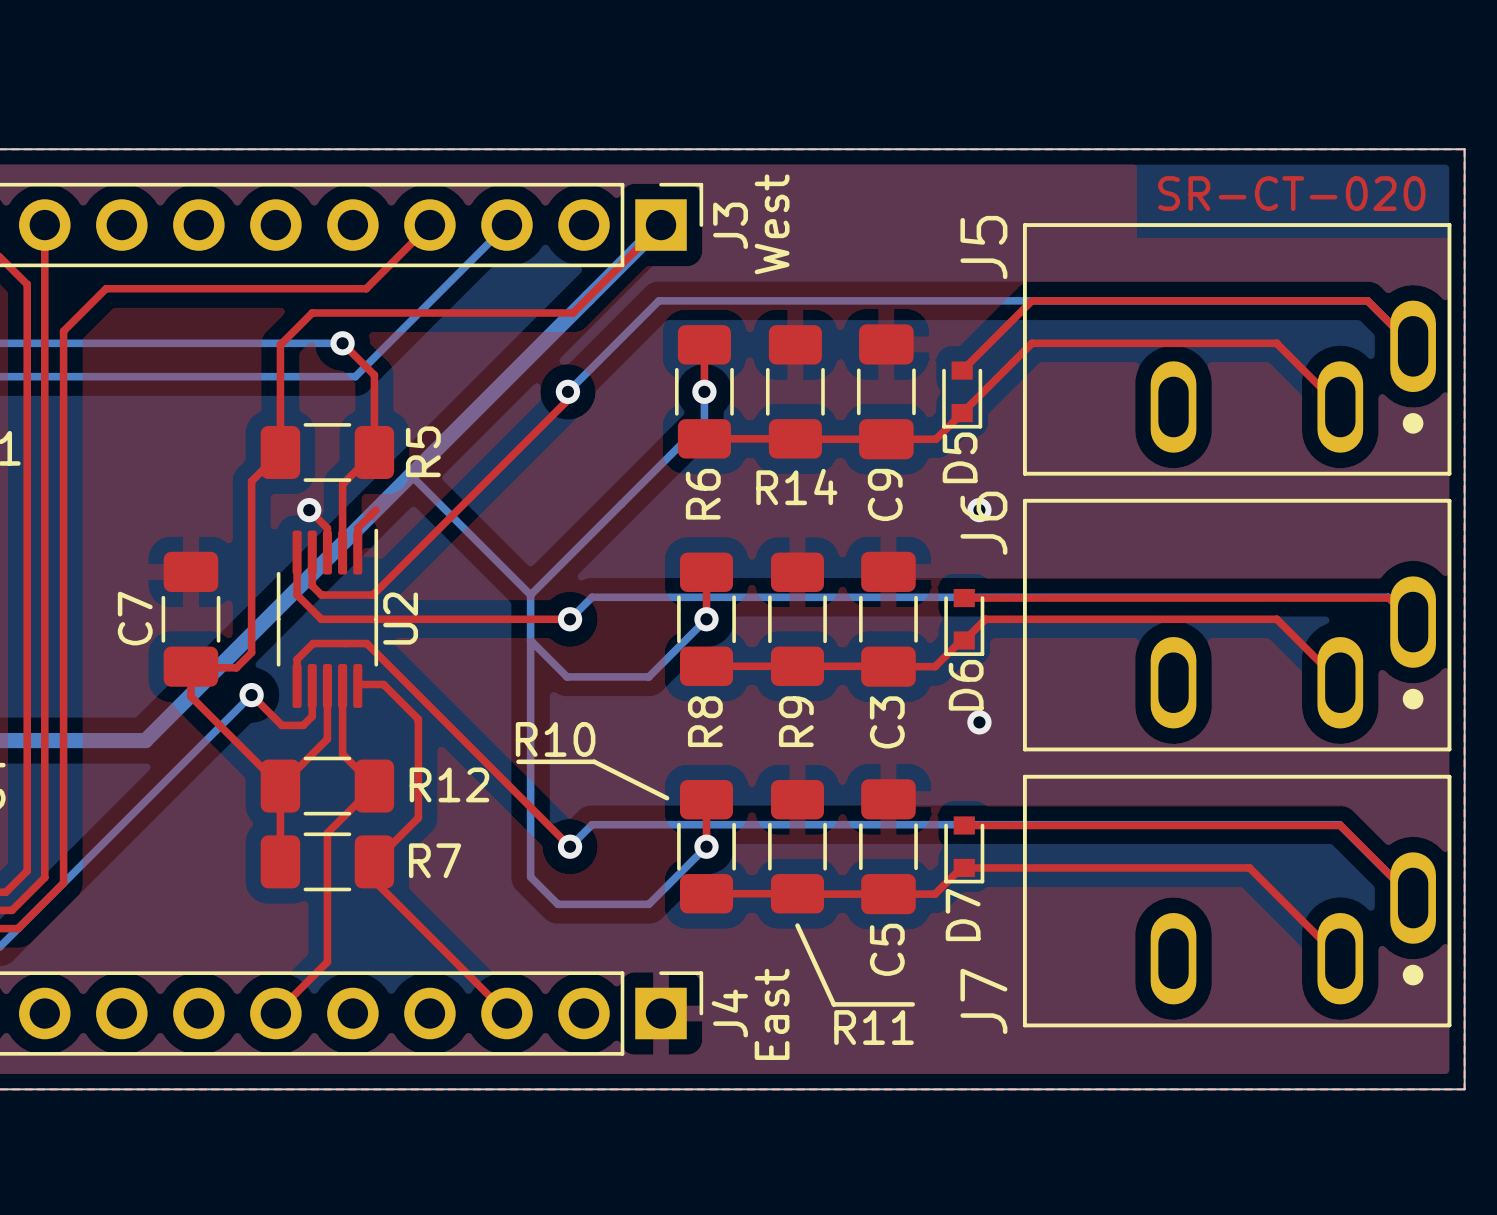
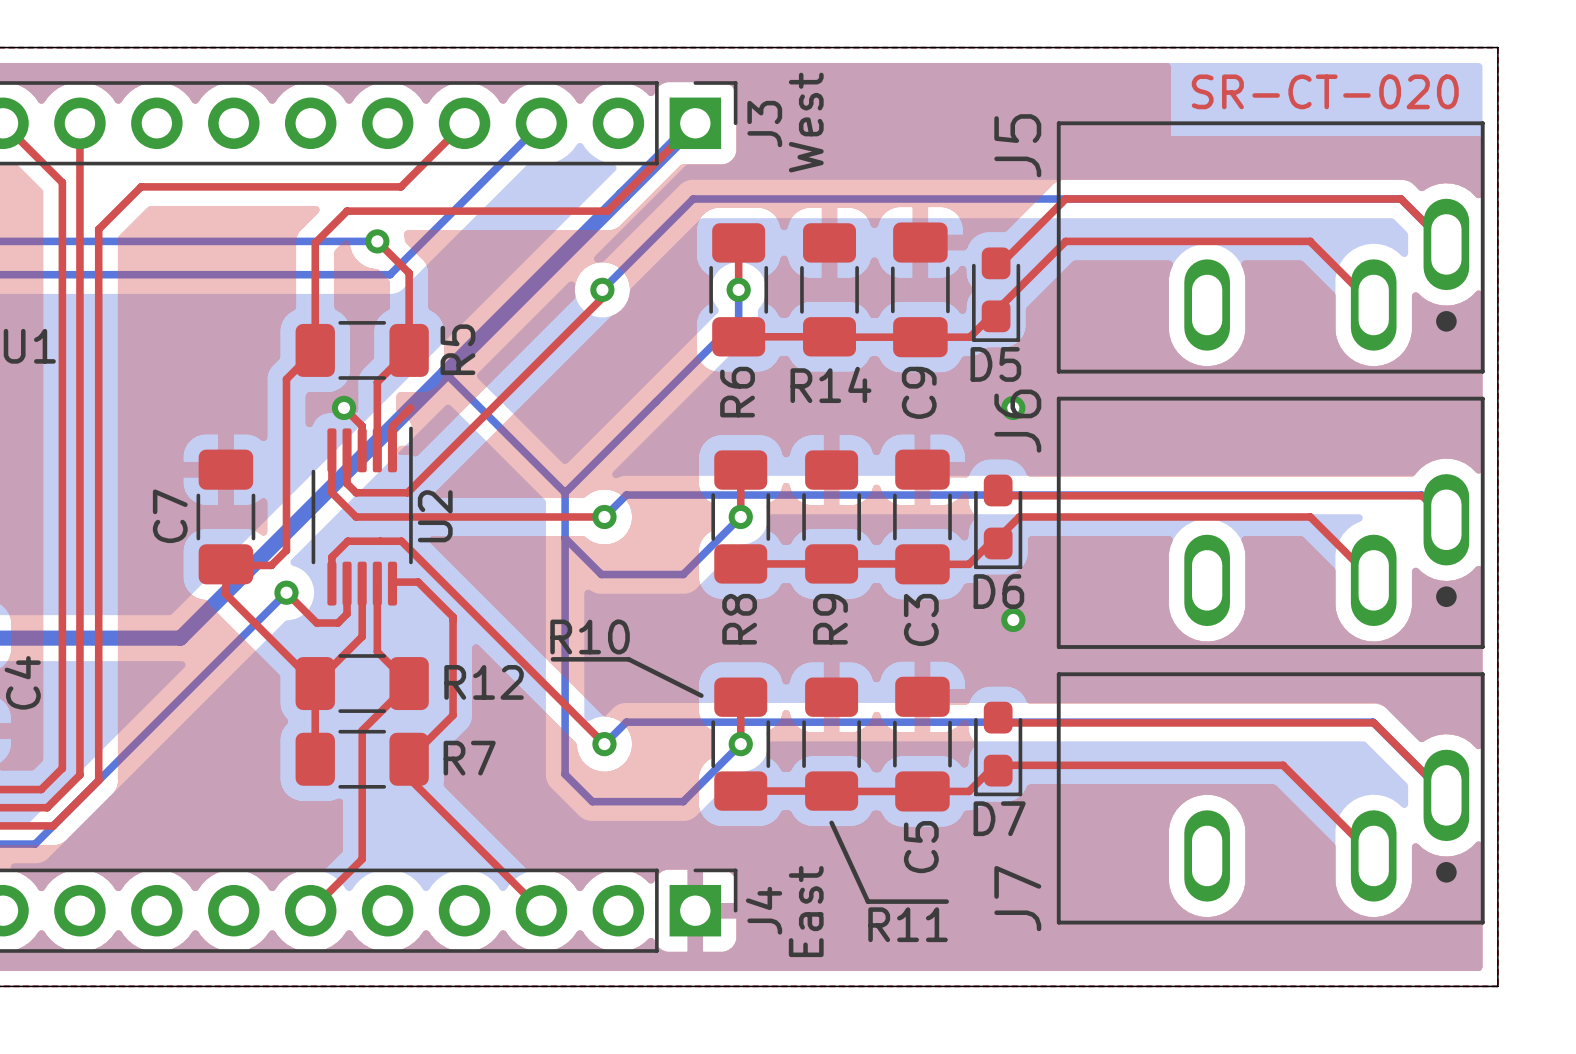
D5 footprint: [942, 361, 983, 429] -> [972, 247, 1021, 342]
D5 name rotation: 0° (960, 457) -> 90° clockwise (995, 364)
D6 footprint: [944, 588, 985, 656] -> [974, 474, 1023, 570]
D6 name rotation: 0° (966, 685) -> 90° clockwise (998, 591)
D7 footprint: [944, 816, 985, 884] -> [974, 701, 1023, 797]
D7 name rotation: 0° (963, 915) -> 90° clockwise (999, 818)

